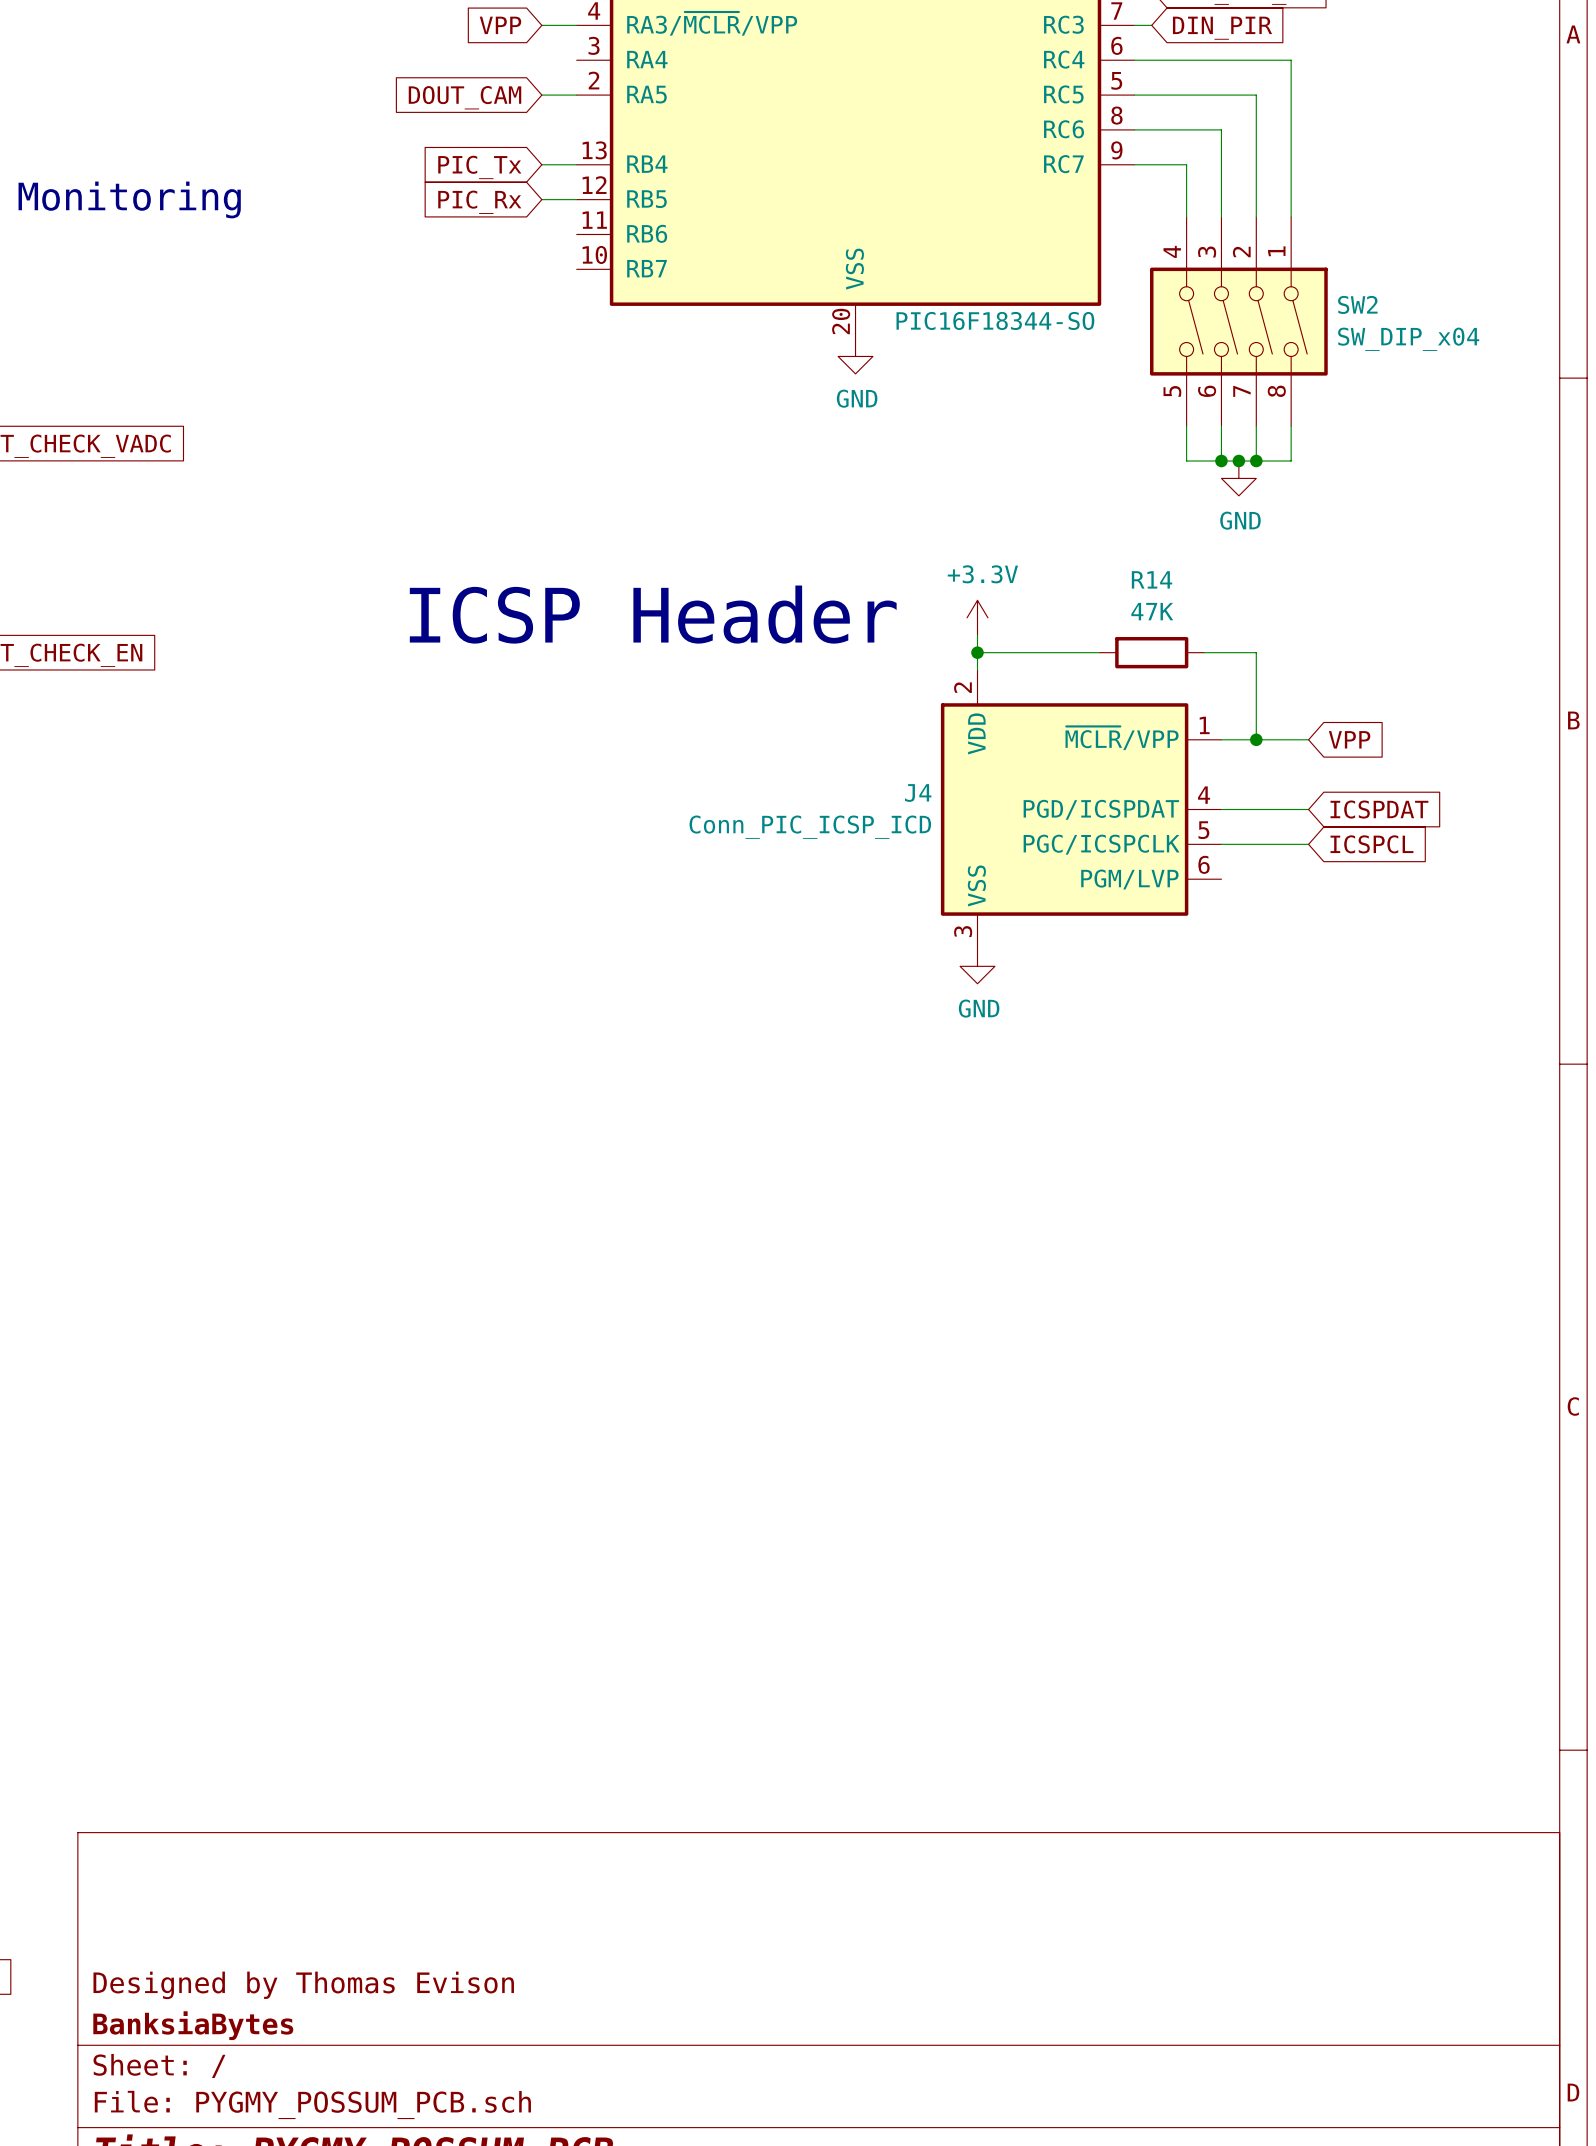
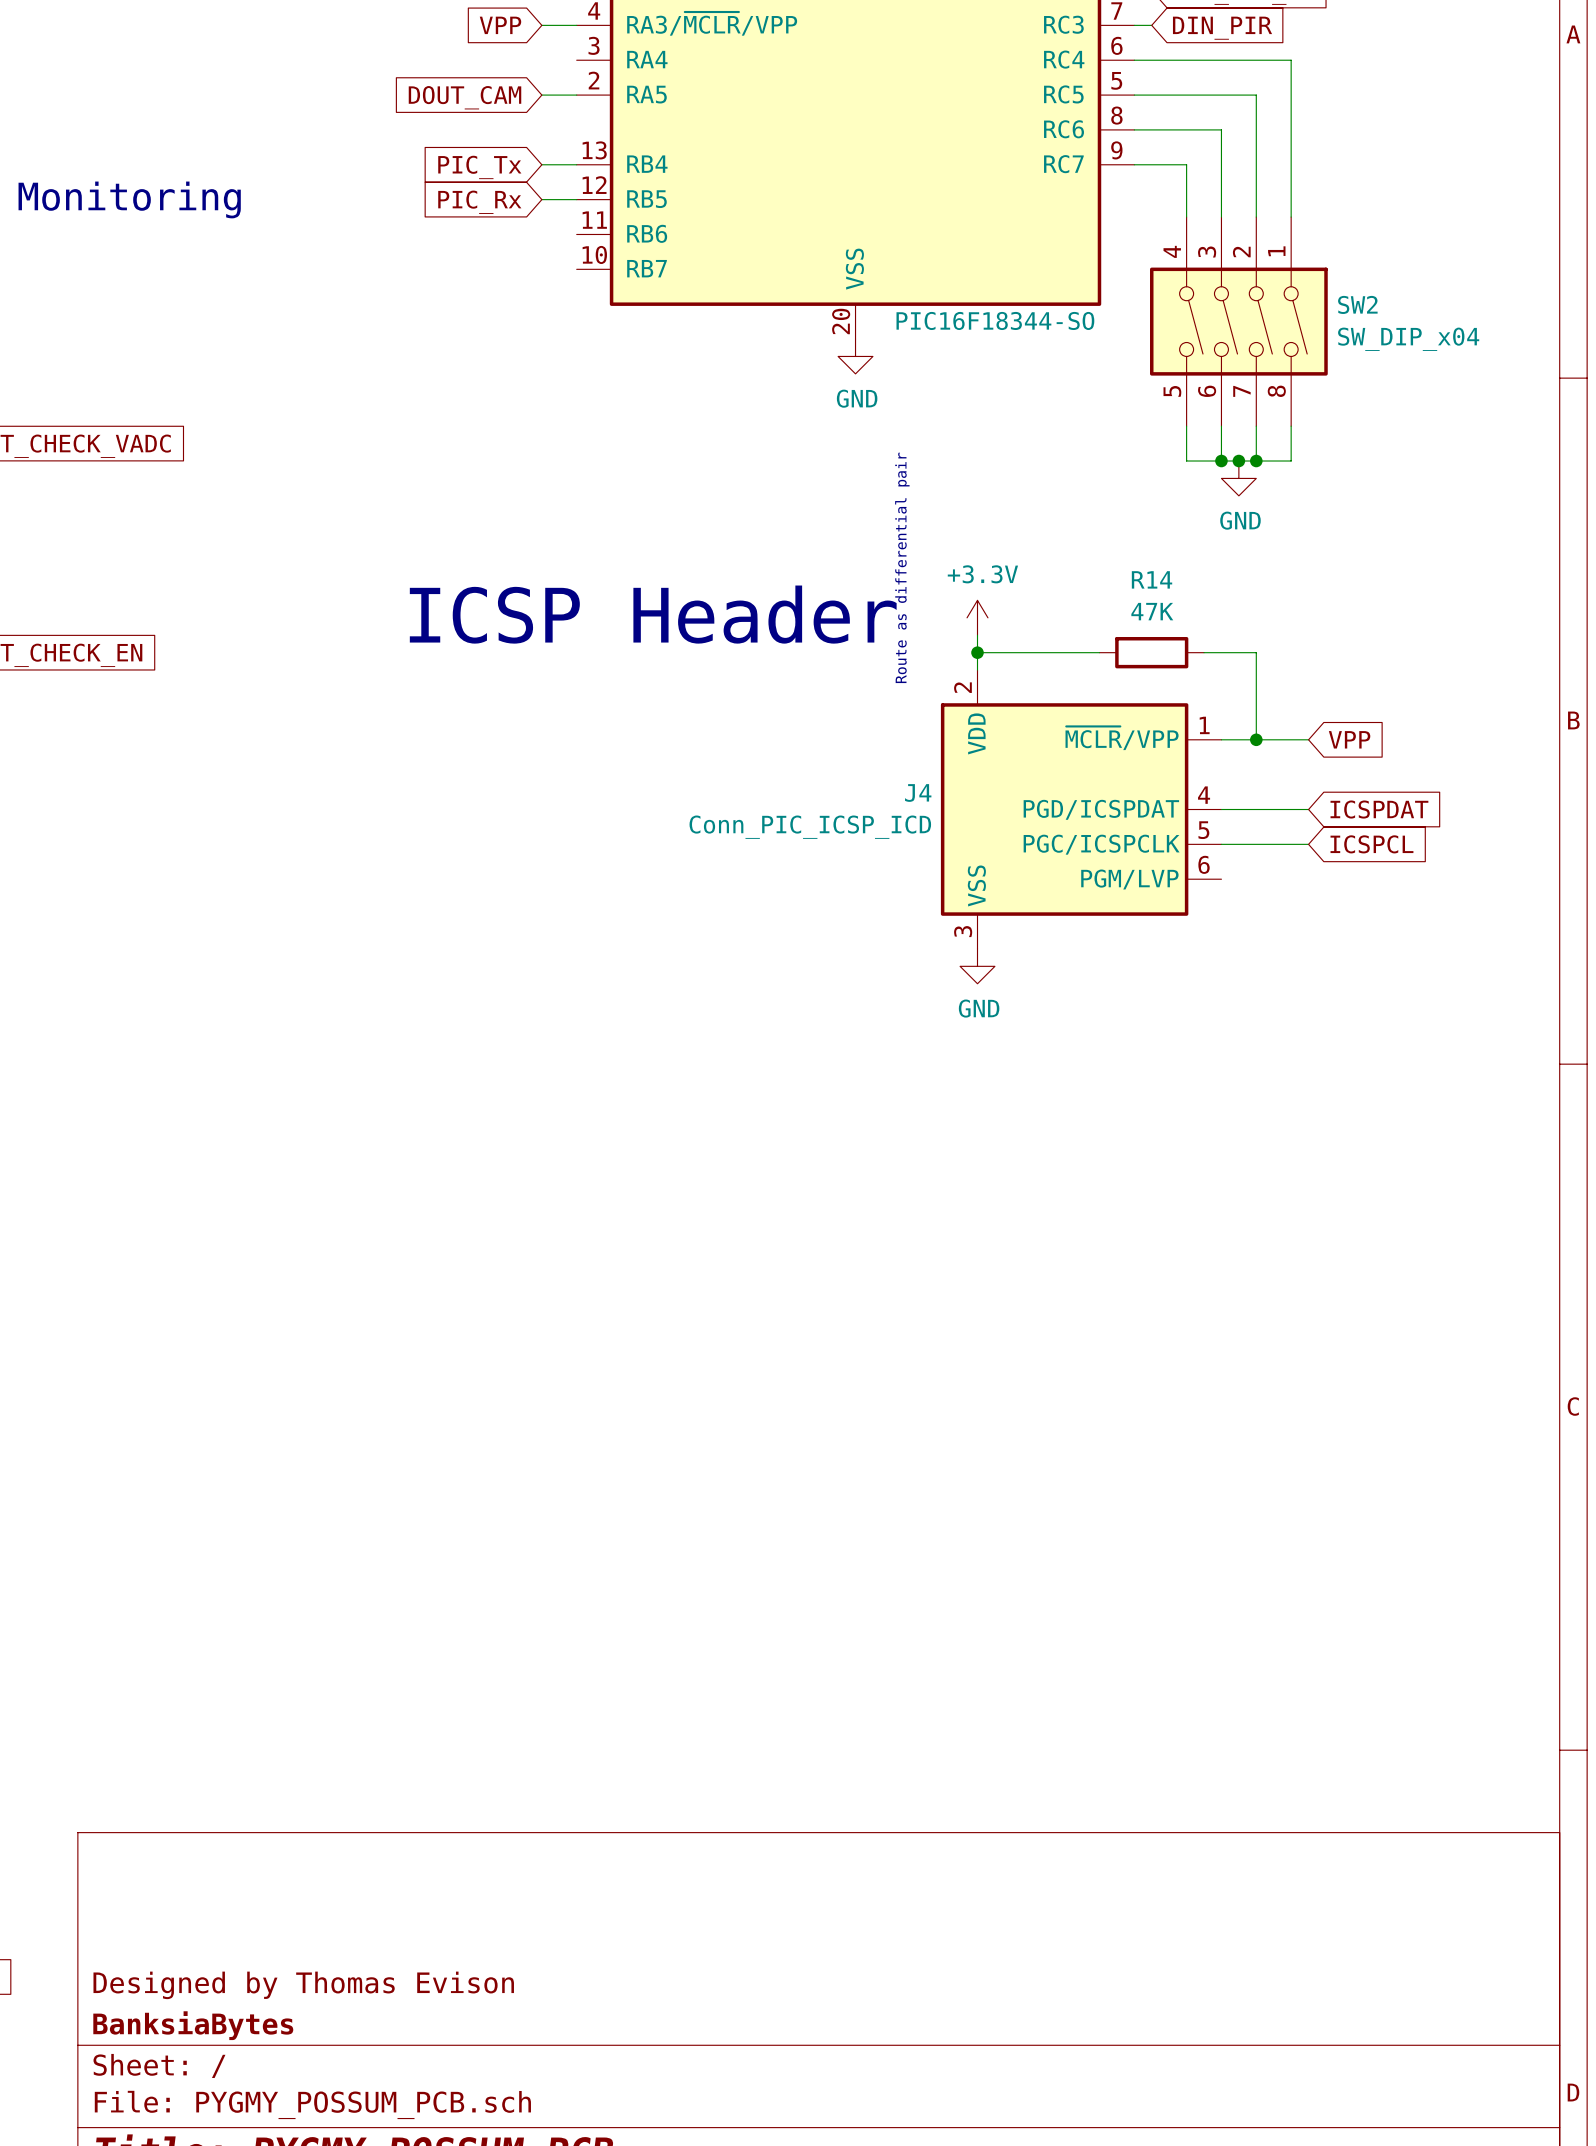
text: none -> Route as differential pair (902, 567)

